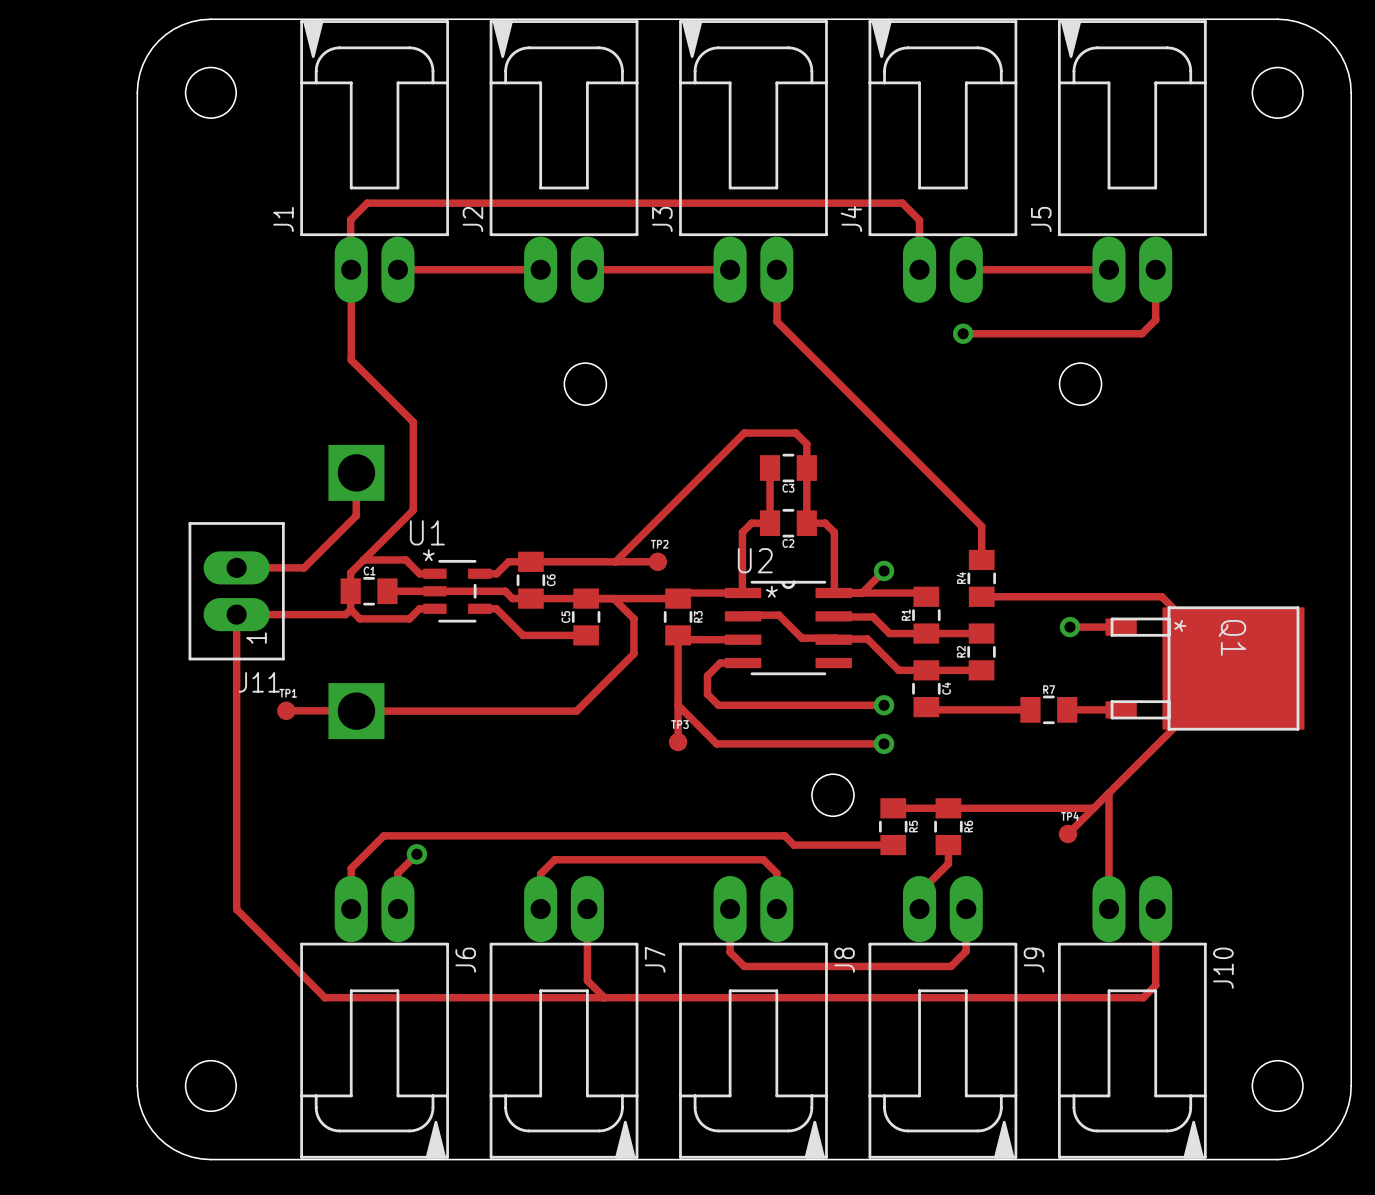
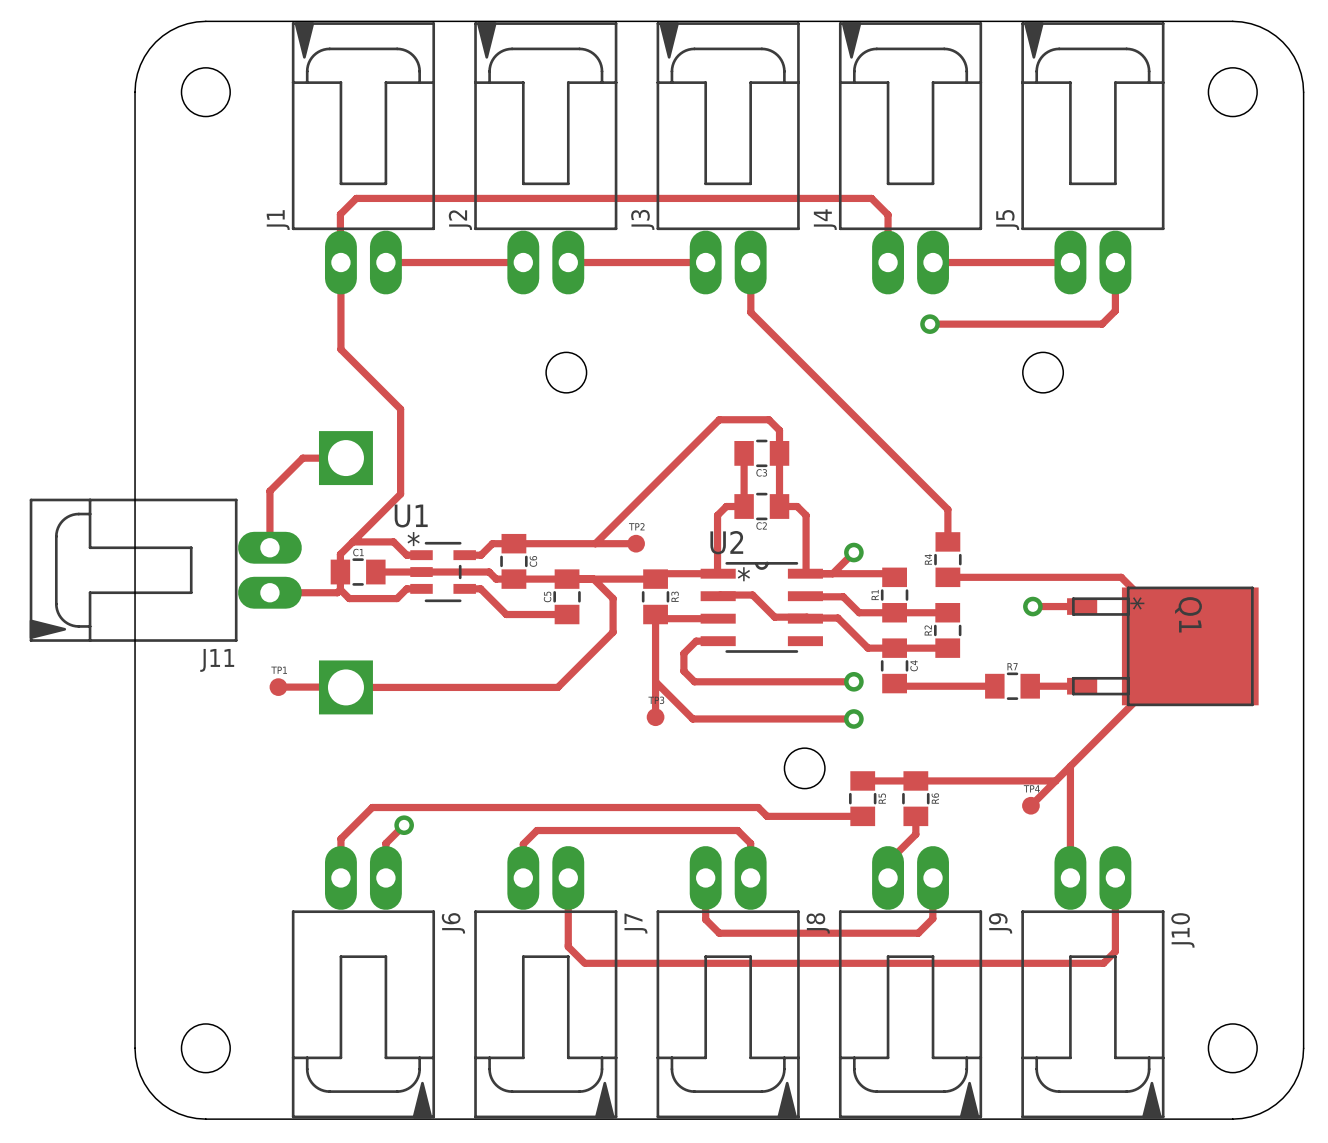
track: (356, 473) (356, 515) (304, 567) (236, 567) -> (345, 458) (302, 458) (269, 491) (269, 547)
J11 footprint: [188, 522, 285, 661] -> [29, 498, 302, 642]
track: (347, 612) (345, 614) (236, 614) (236, 909) (324, 997) (606, 997) -> (337, 592) (269, 592)

